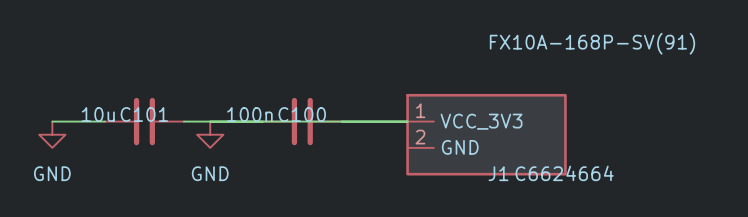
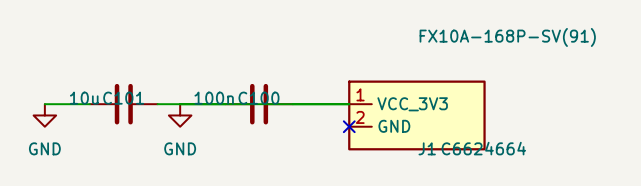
no-connect mark: none -> (349, 126)

